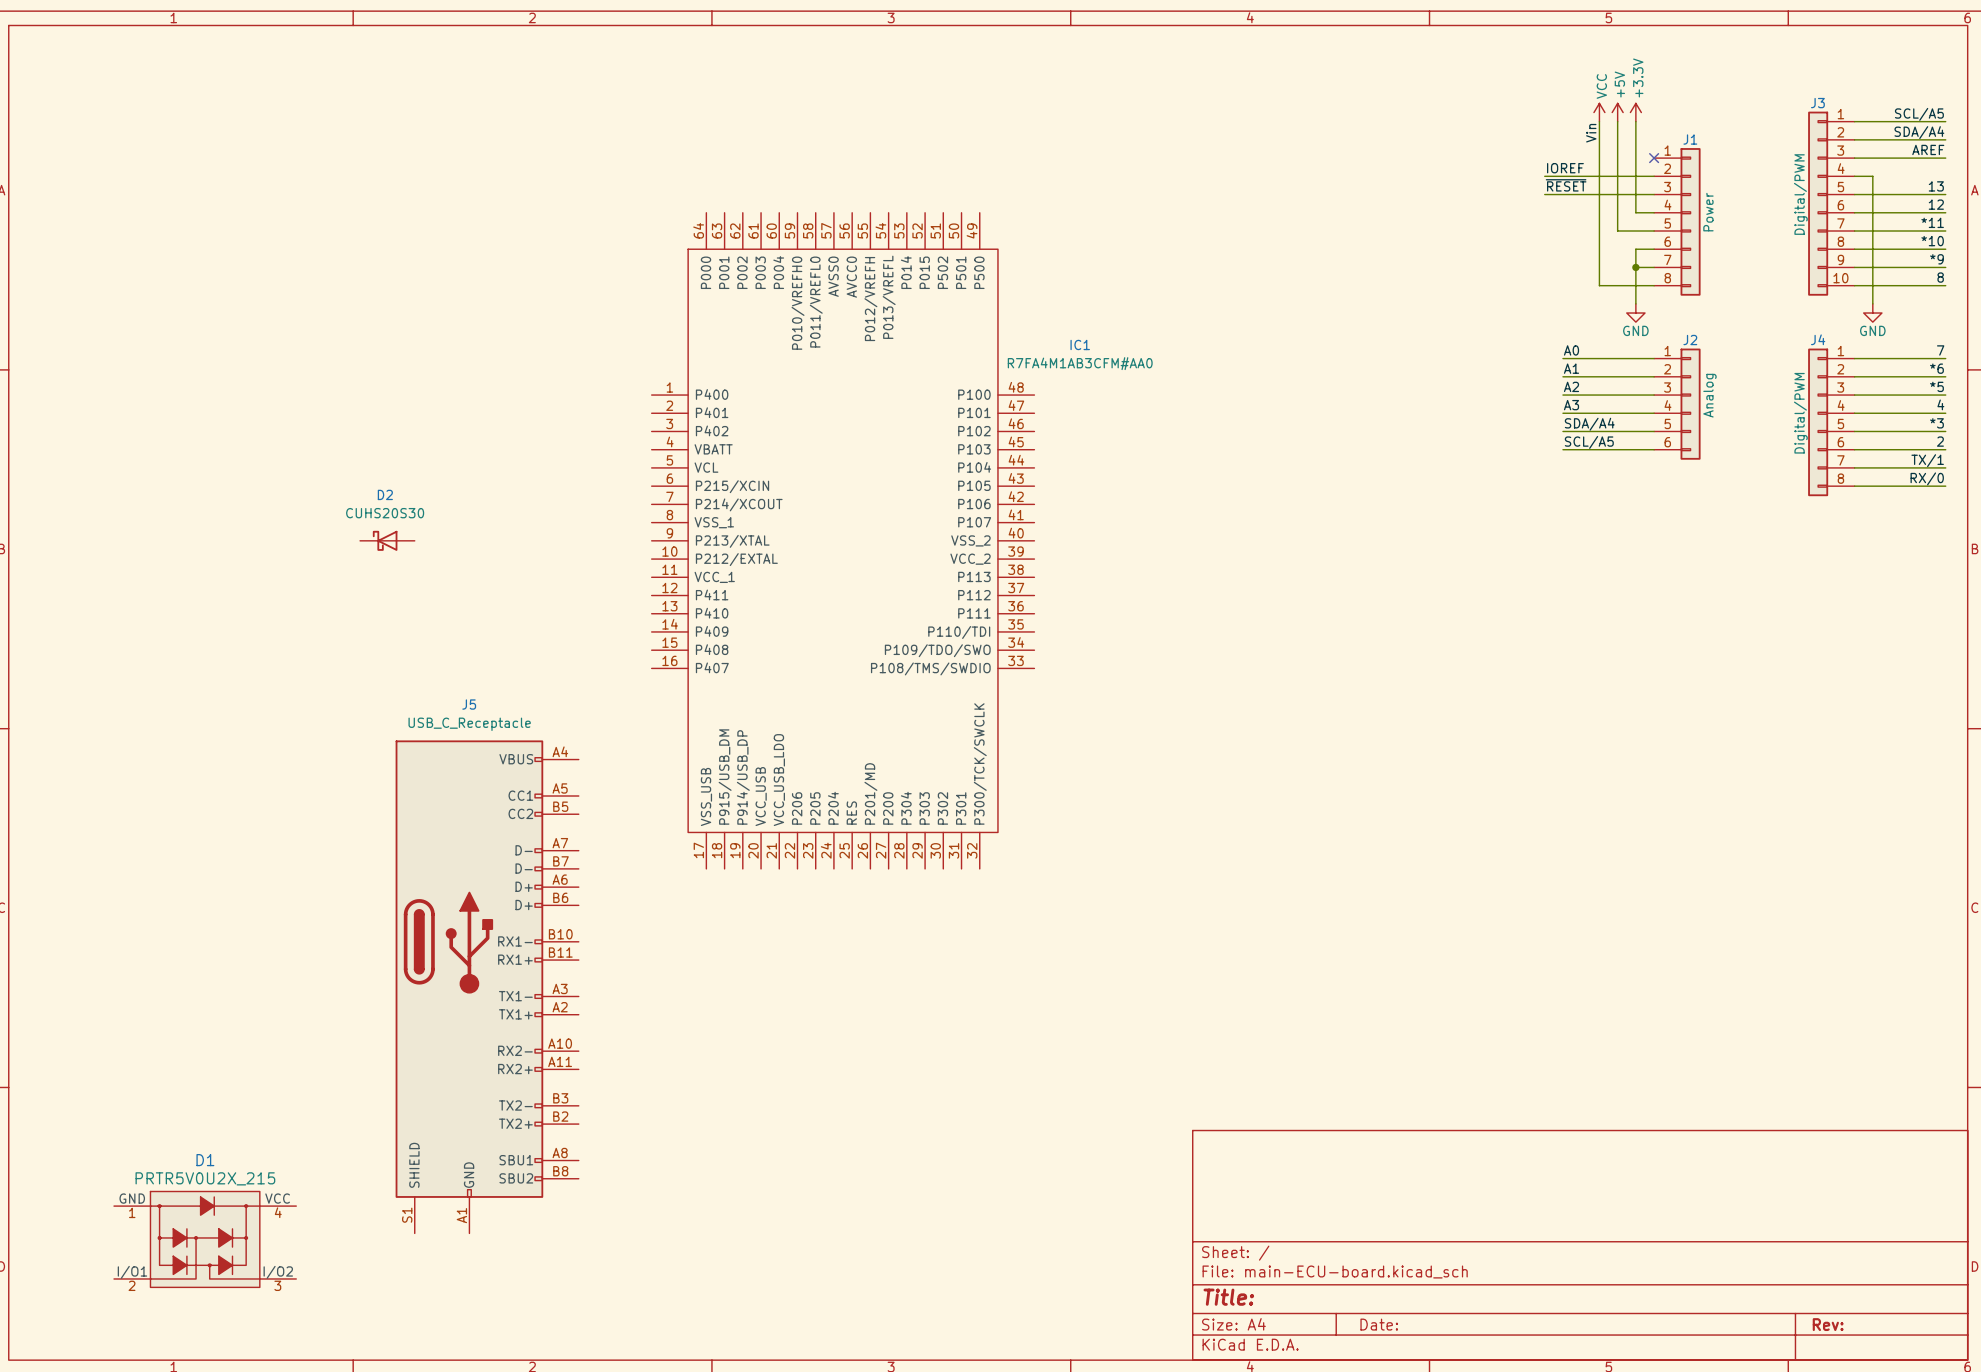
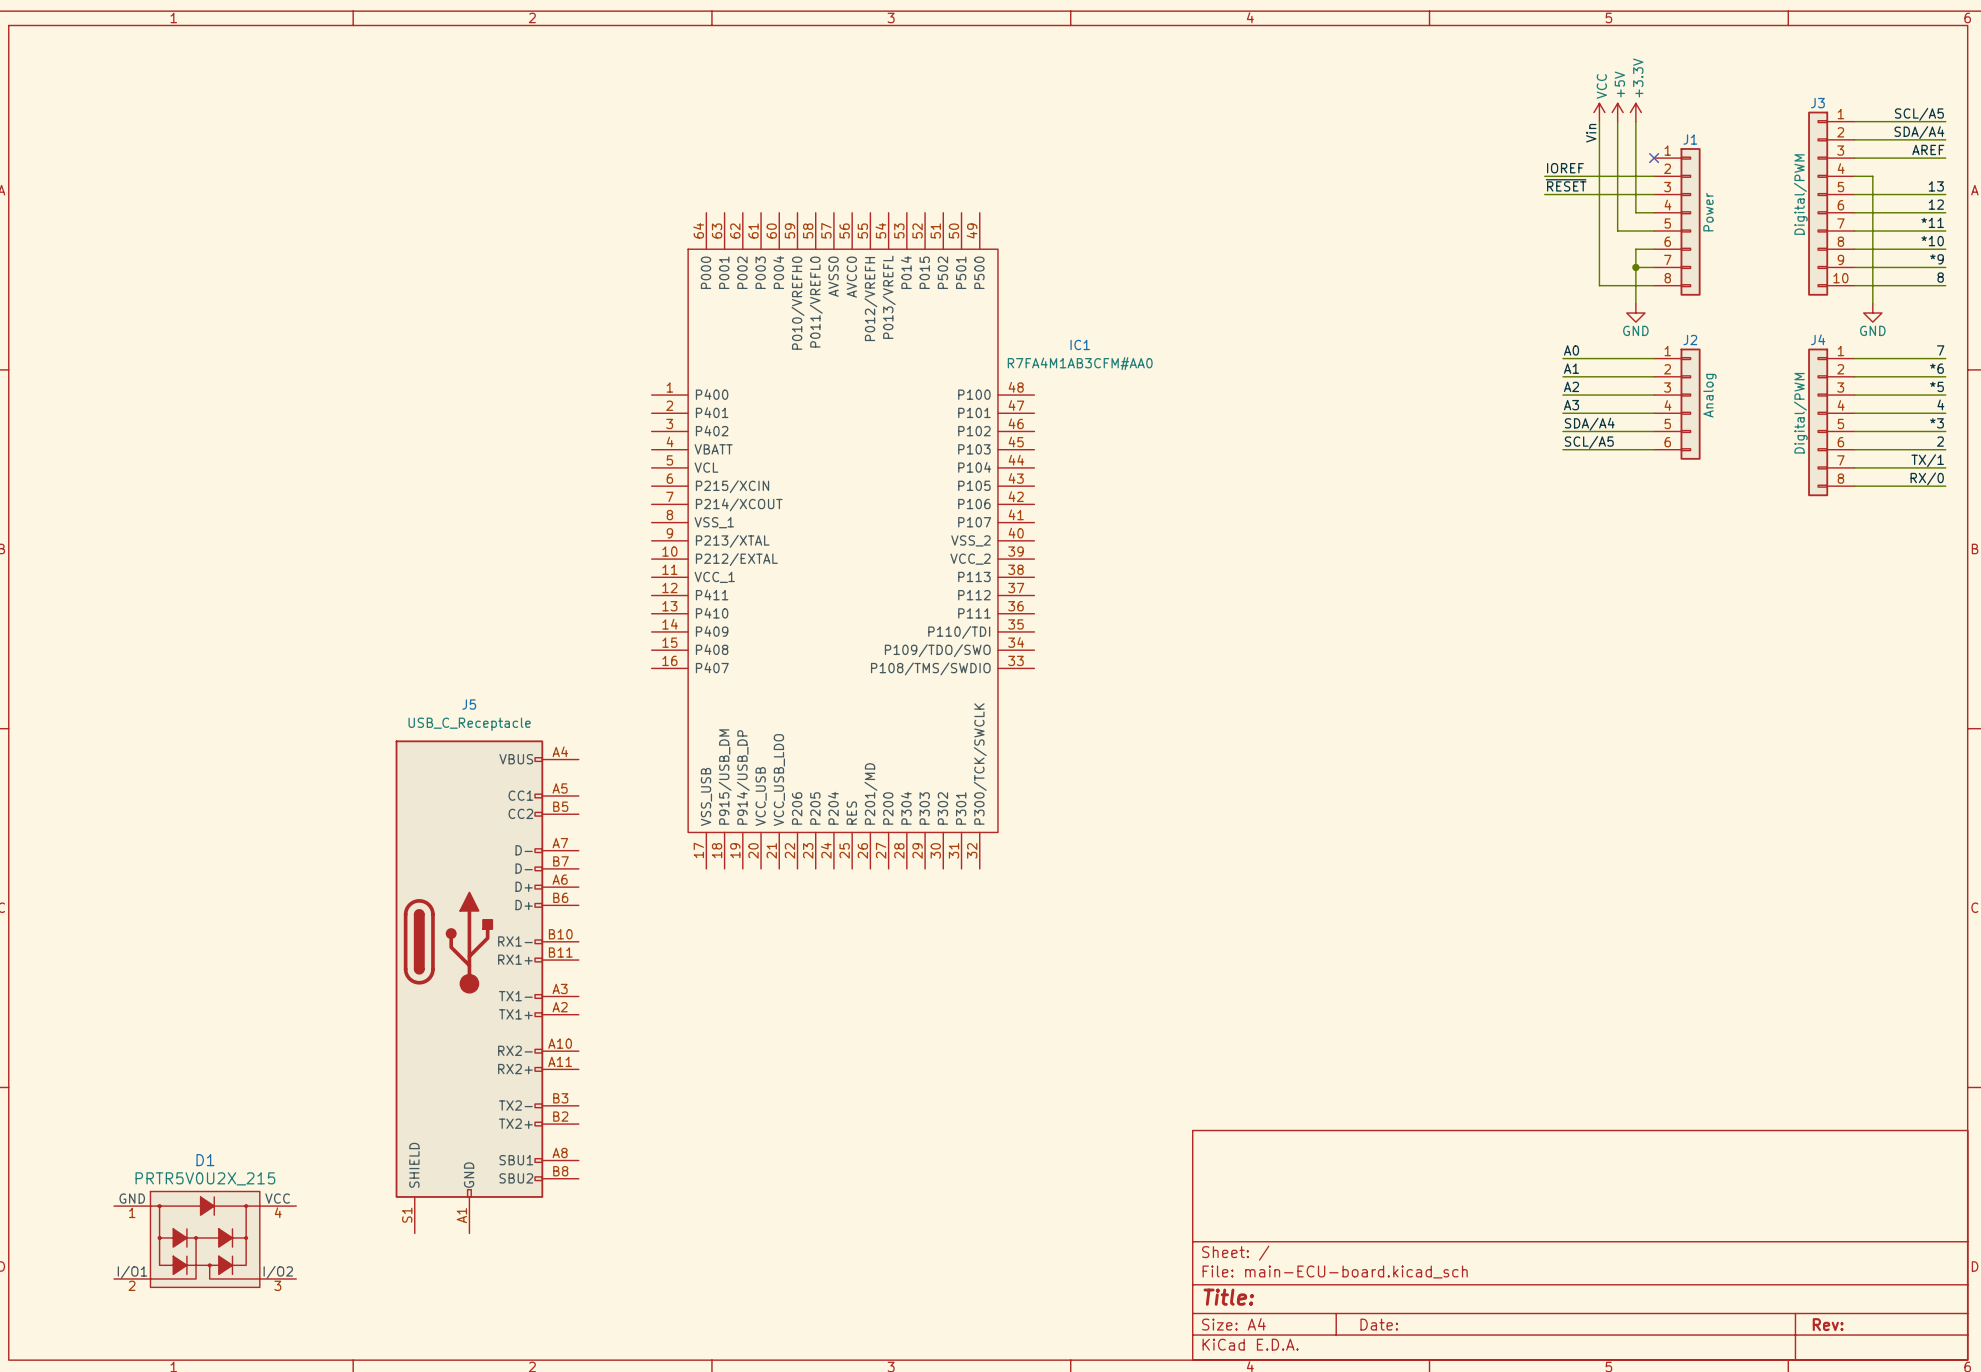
D2: CUHS20S30 (387, 540) -> none

